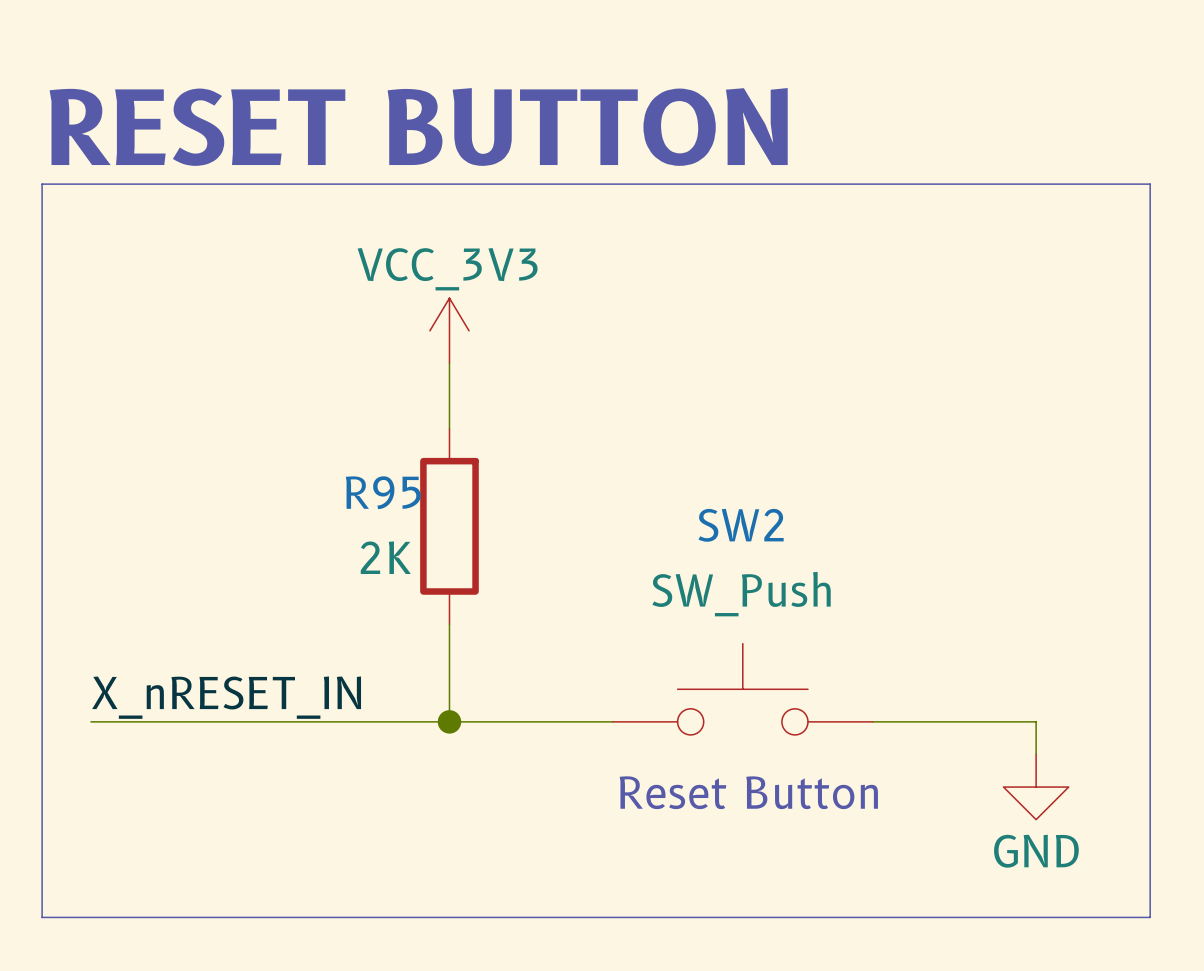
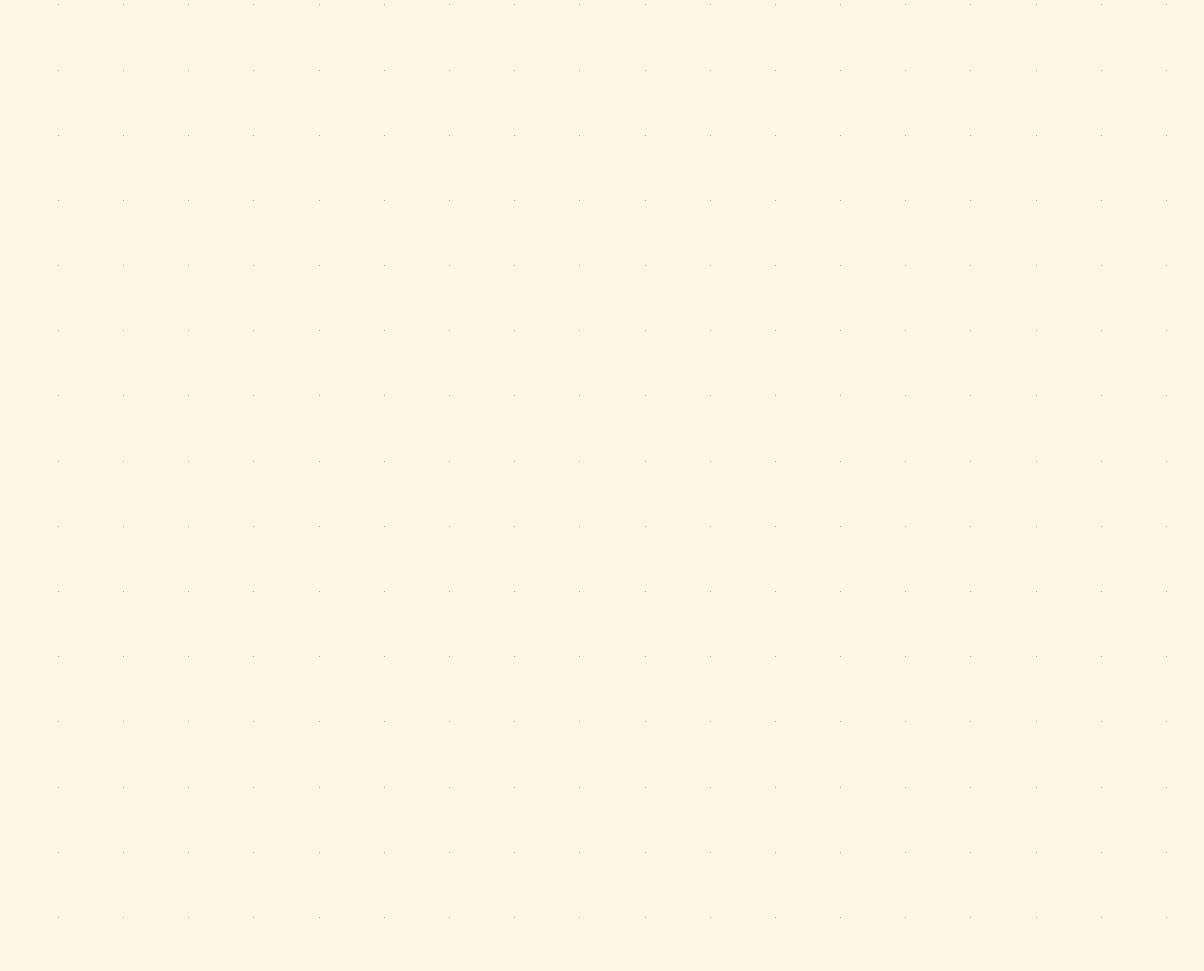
text: RESET BUTTON (418, 126) -> none
line: (42, 184) (1150, 184) (1150, 917) (42, 917) (42, 184) -> none
power symbol: VCC_3V3 (449, 330) -> none
wire: (449, 363) (449, 428) -> none
R95: 2K (449, 526) -> none
wire: (449, 624) (449, 721) -> none
SW2: SW_Push (742, 689) -> none
label: X_nRESET_IN (226, 697) -> none
wire: (90, 721) (612, 721) -> none
junction: (449, 721) -> none
wire: (873, 721) (1036, 721) (1036, 754) -> none
power symbol: GND (1036, 787) -> none
text: Reset Button (748, 792) -> none

